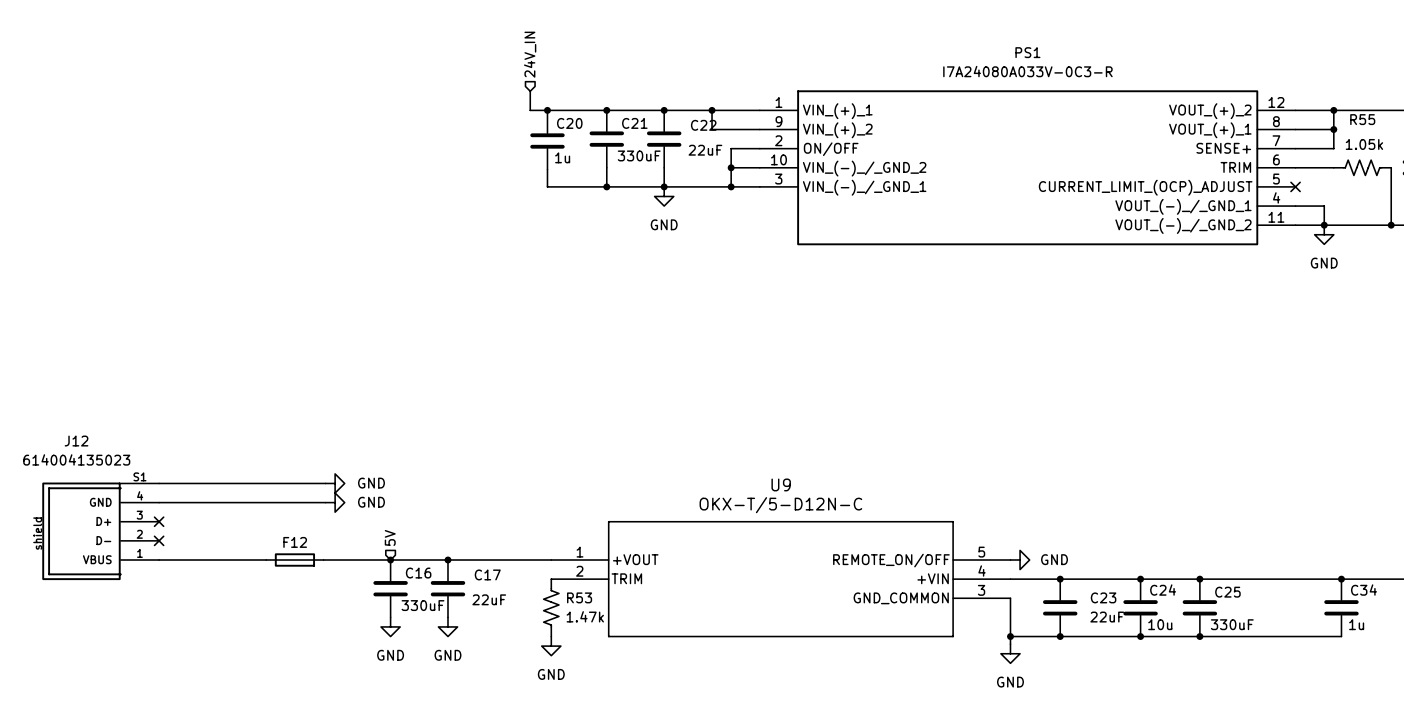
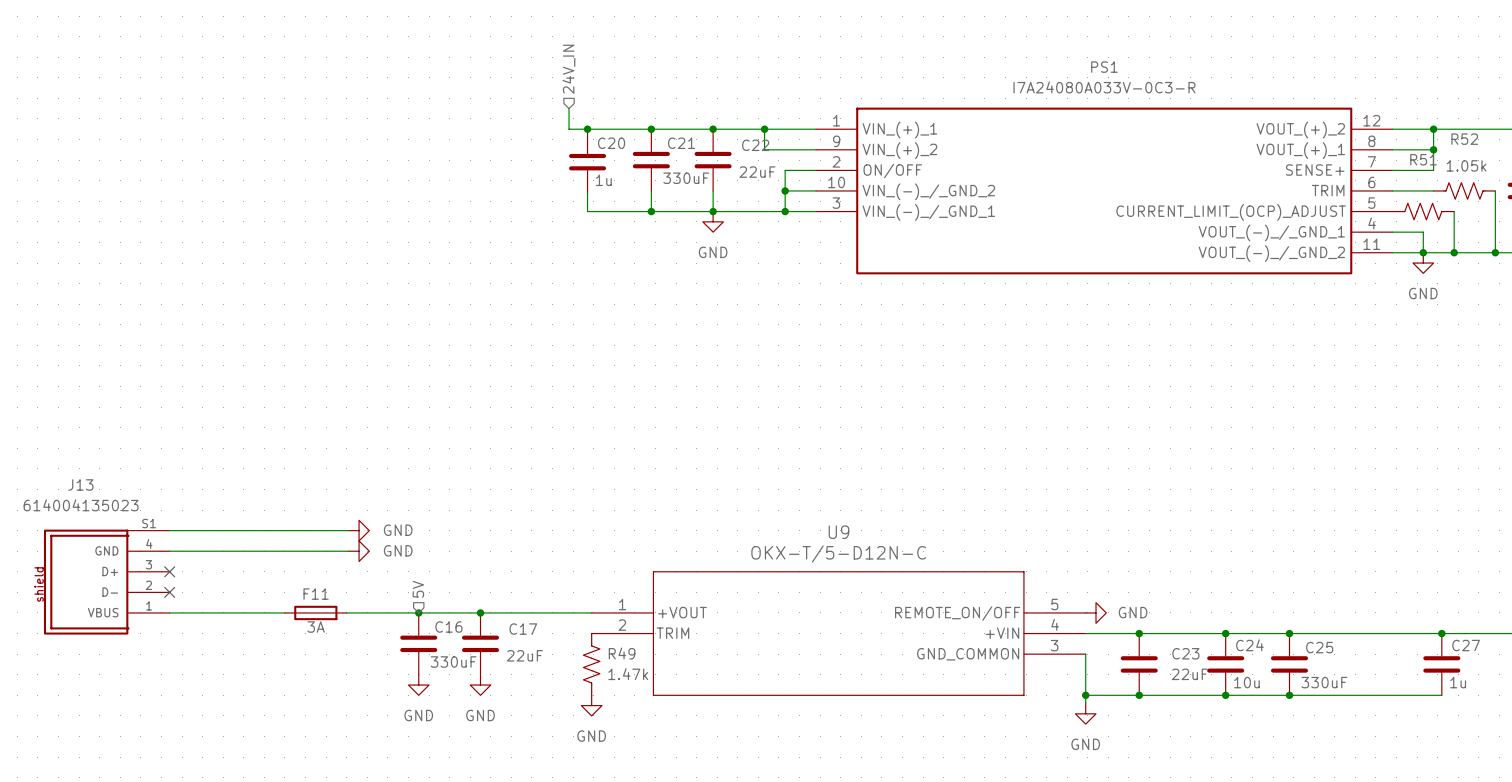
R55 name: R55 (1362, 119) -> R52 (1464, 139)
no-connect mark: (1295, 186) -> none
R51: none -> (1423, 211)
wire: none -> (1454, 211) (1454, 252)
junction: none -> (1454, 252)
J12 name: J12 (76, 441) -> J13 (80, 484)
F12 name: F12 (295, 542) -> F11 (316, 594)
F12 value: none -> 3A (316, 627)
C34 name: C34 (1364, 590) -> C27 (1466, 645)
R53 name: R53 (579, 597) -> R49 (622, 653)

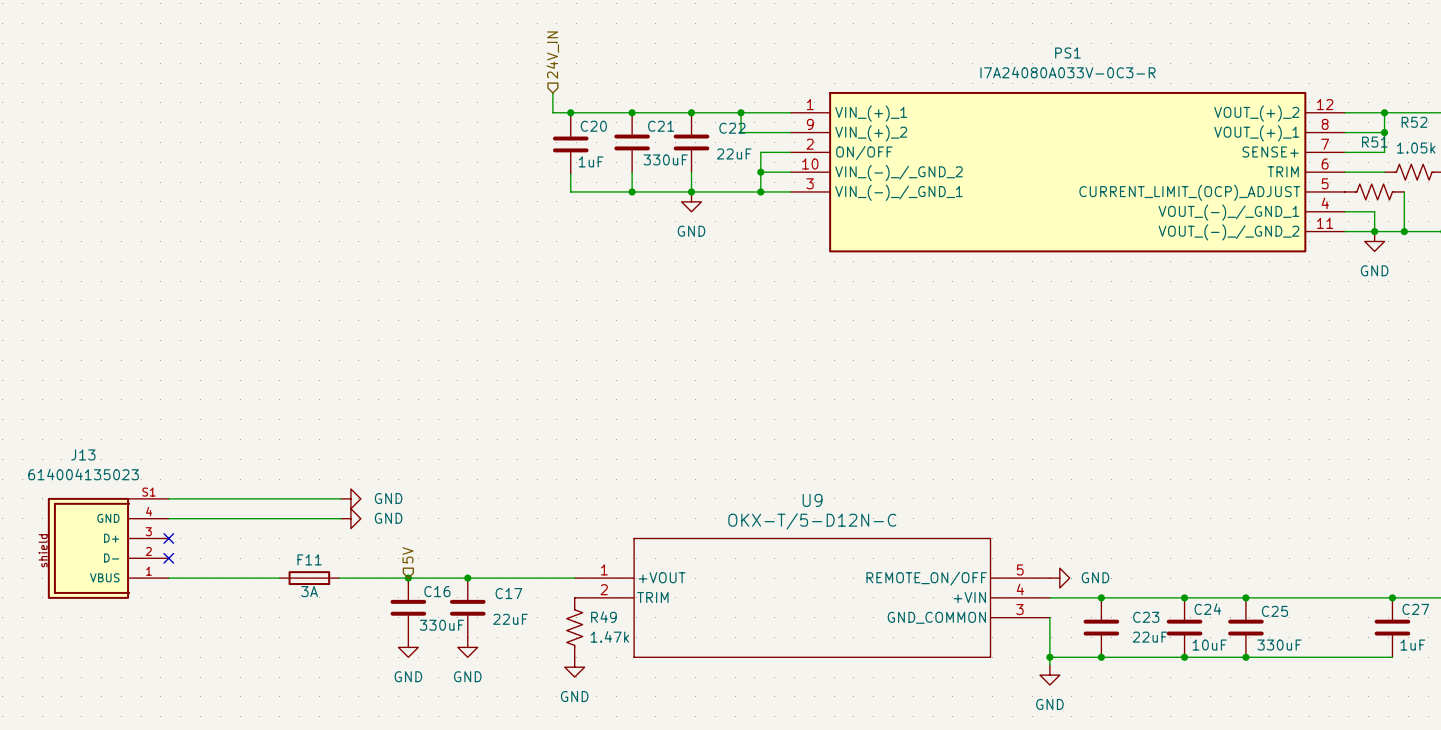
C20 value: 1u (603, 180) -> 1uF (591, 161)
C24 value: 10u (1246, 682) -> 10uF (1209, 645)
C27 value: 1u (1458, 682) -> 1uF (1412, 645)

